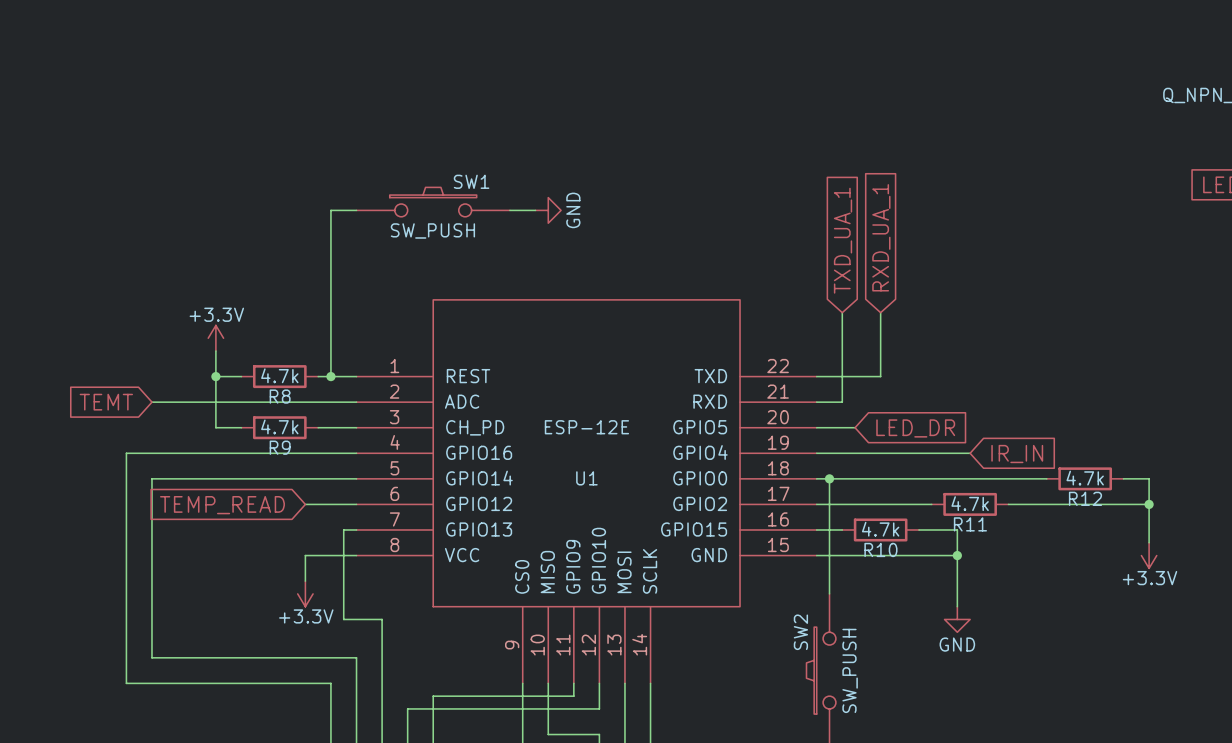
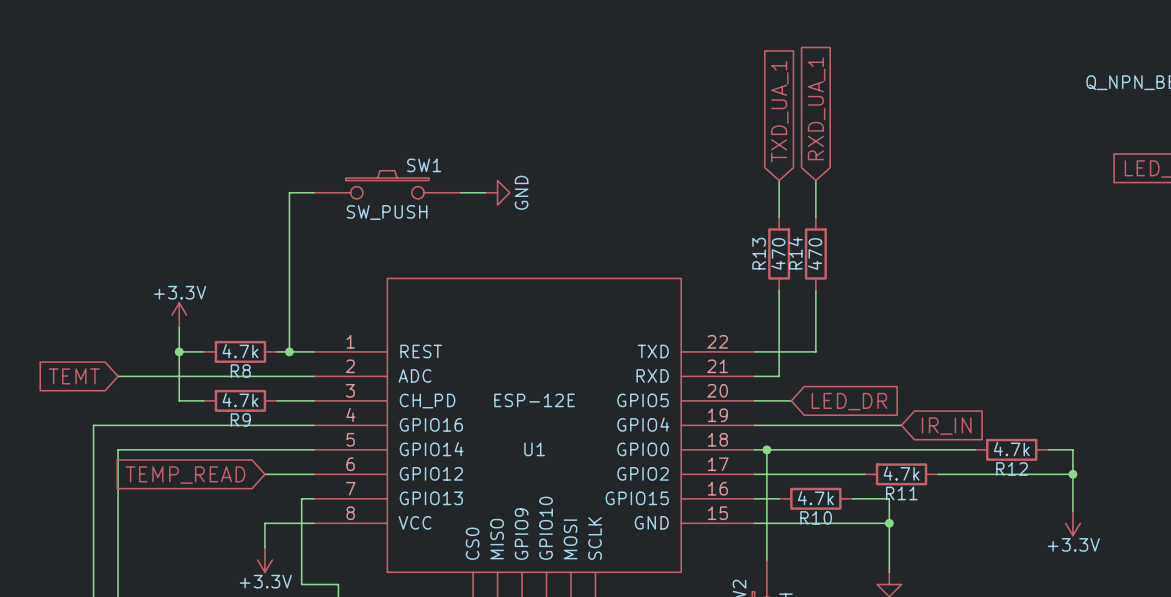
wire: none -> (779, 180) (779, 217)
wire: none -> (815, 180) (815, 217)
global label position: RXD_UA_1 (881, 237) -> RXD_UA_1 (816, 108)
global label position: TXD_UA_1 (843, 240) -> TXD_UA_1 (779, 111)
R13: none -> 470 (779, 253)
R14: none -> 470 (815, 253)

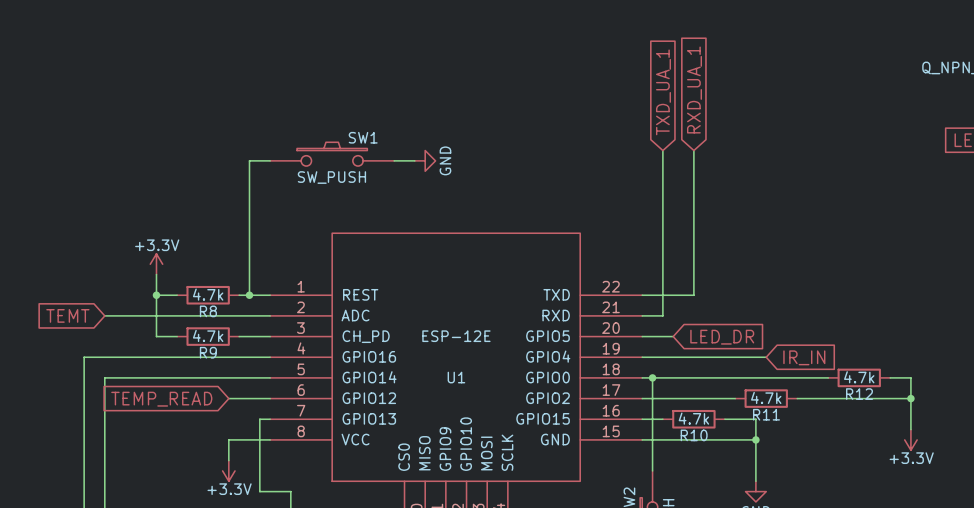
wire: none -> (662, 181) (662, 243)
wire: none -> (693, 181) (693, 243)
R13: 470 (779, 253) -> none
R14: 470 (815, 253) -> none

